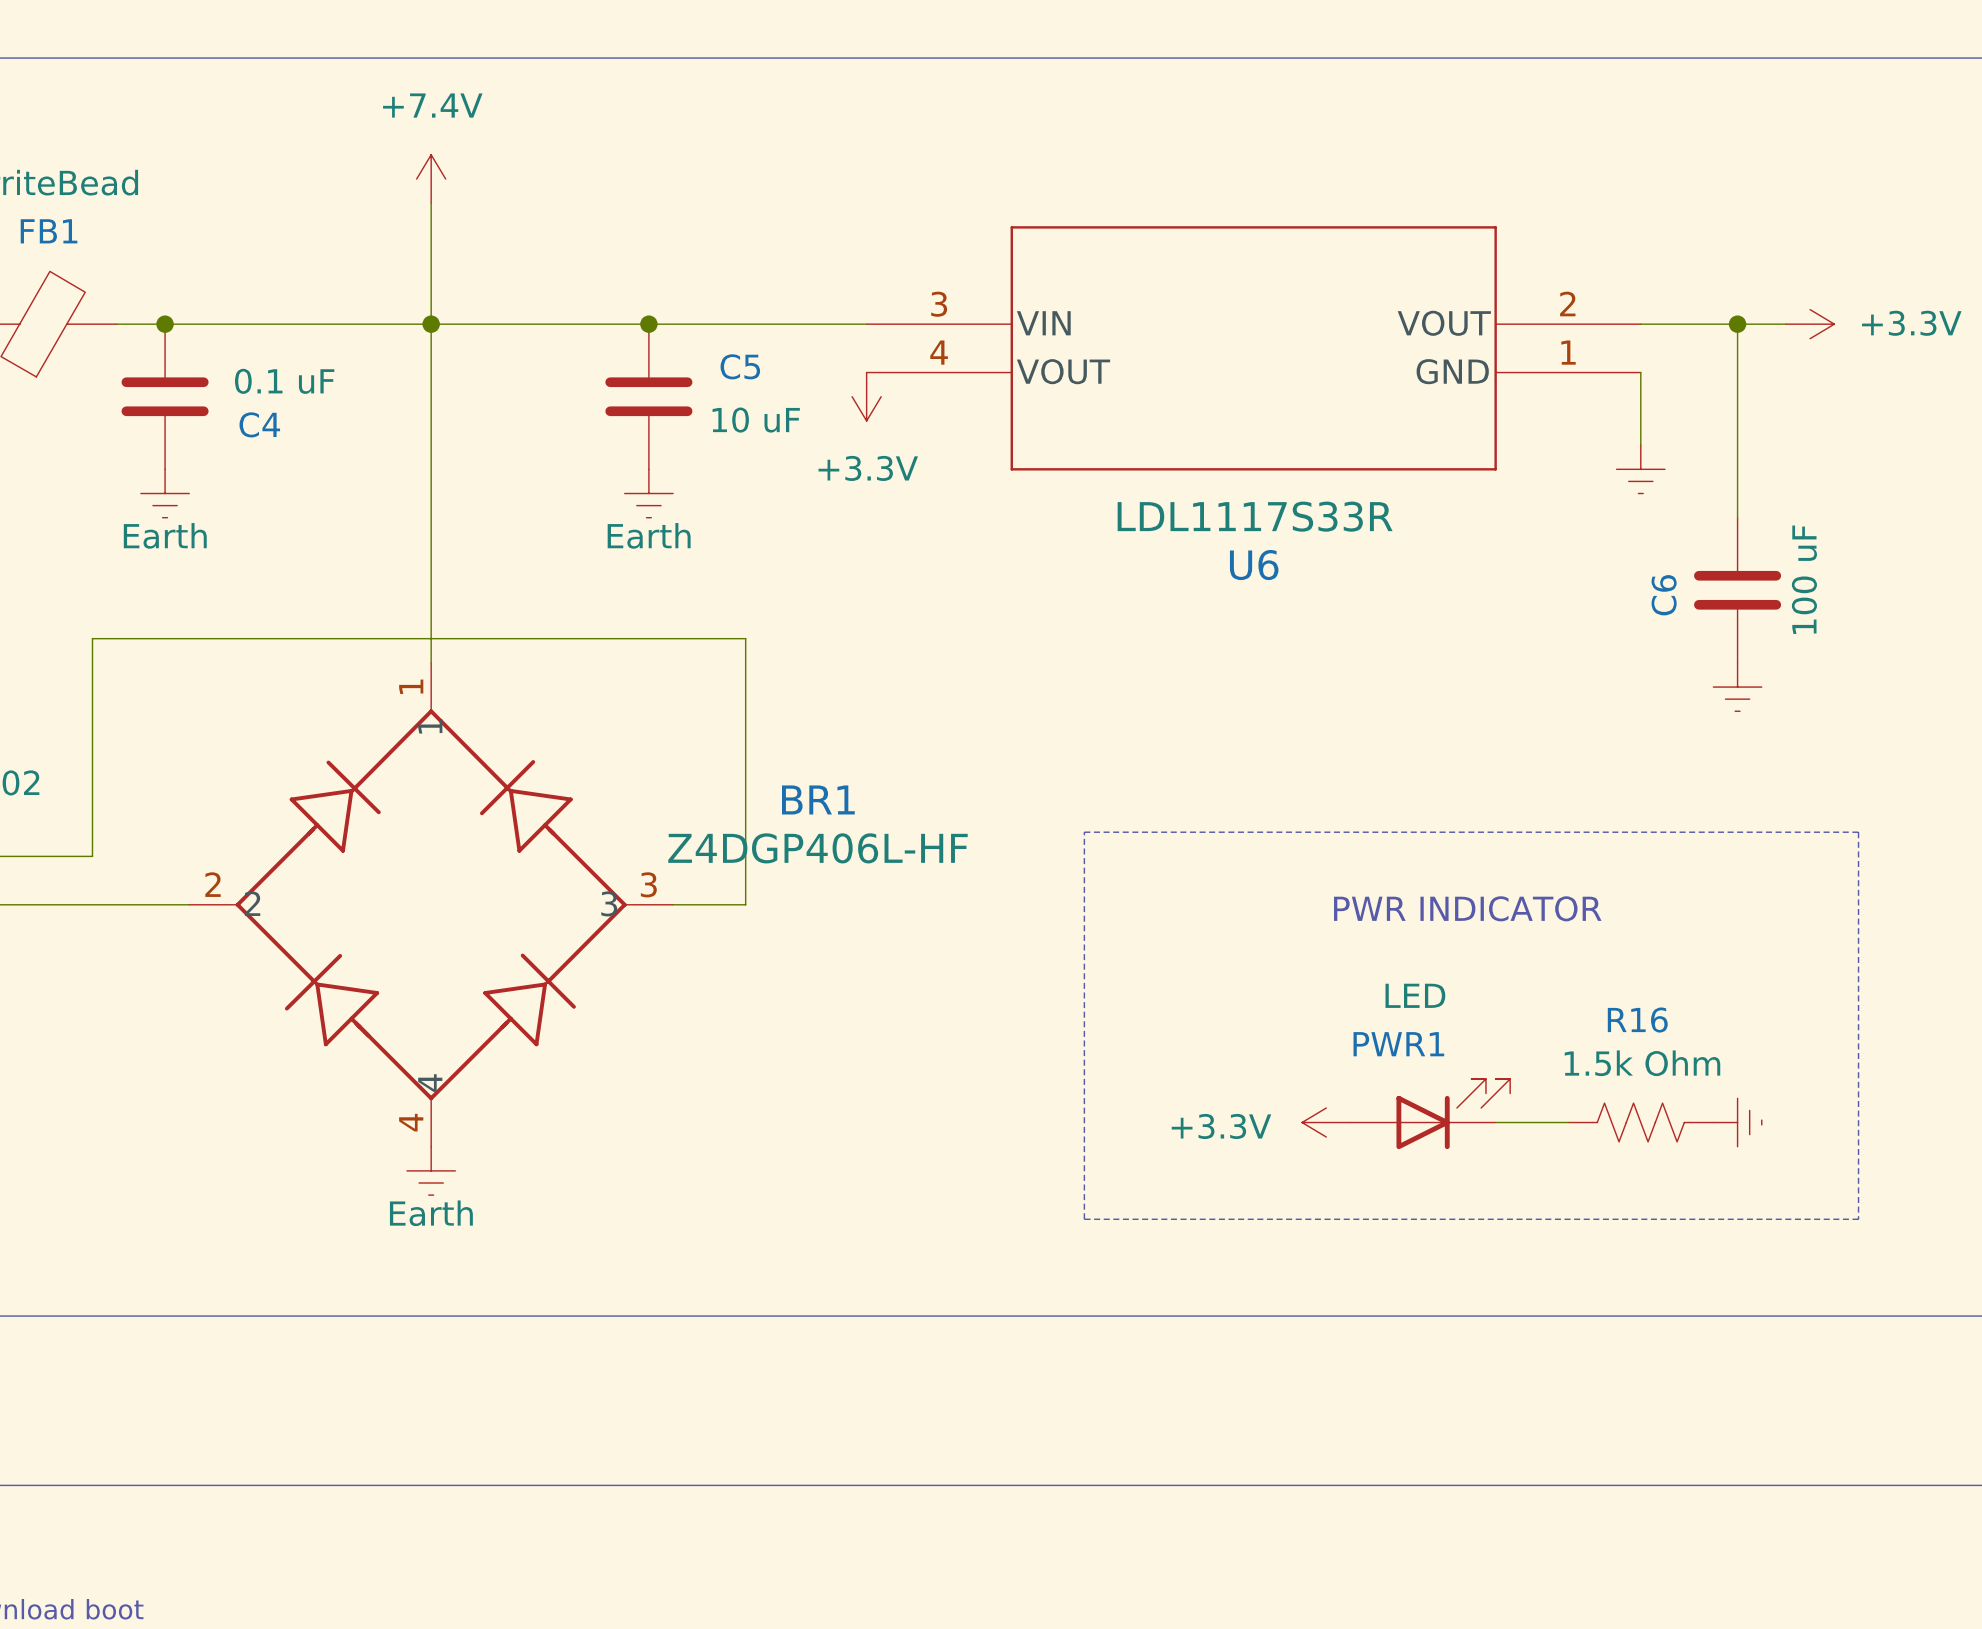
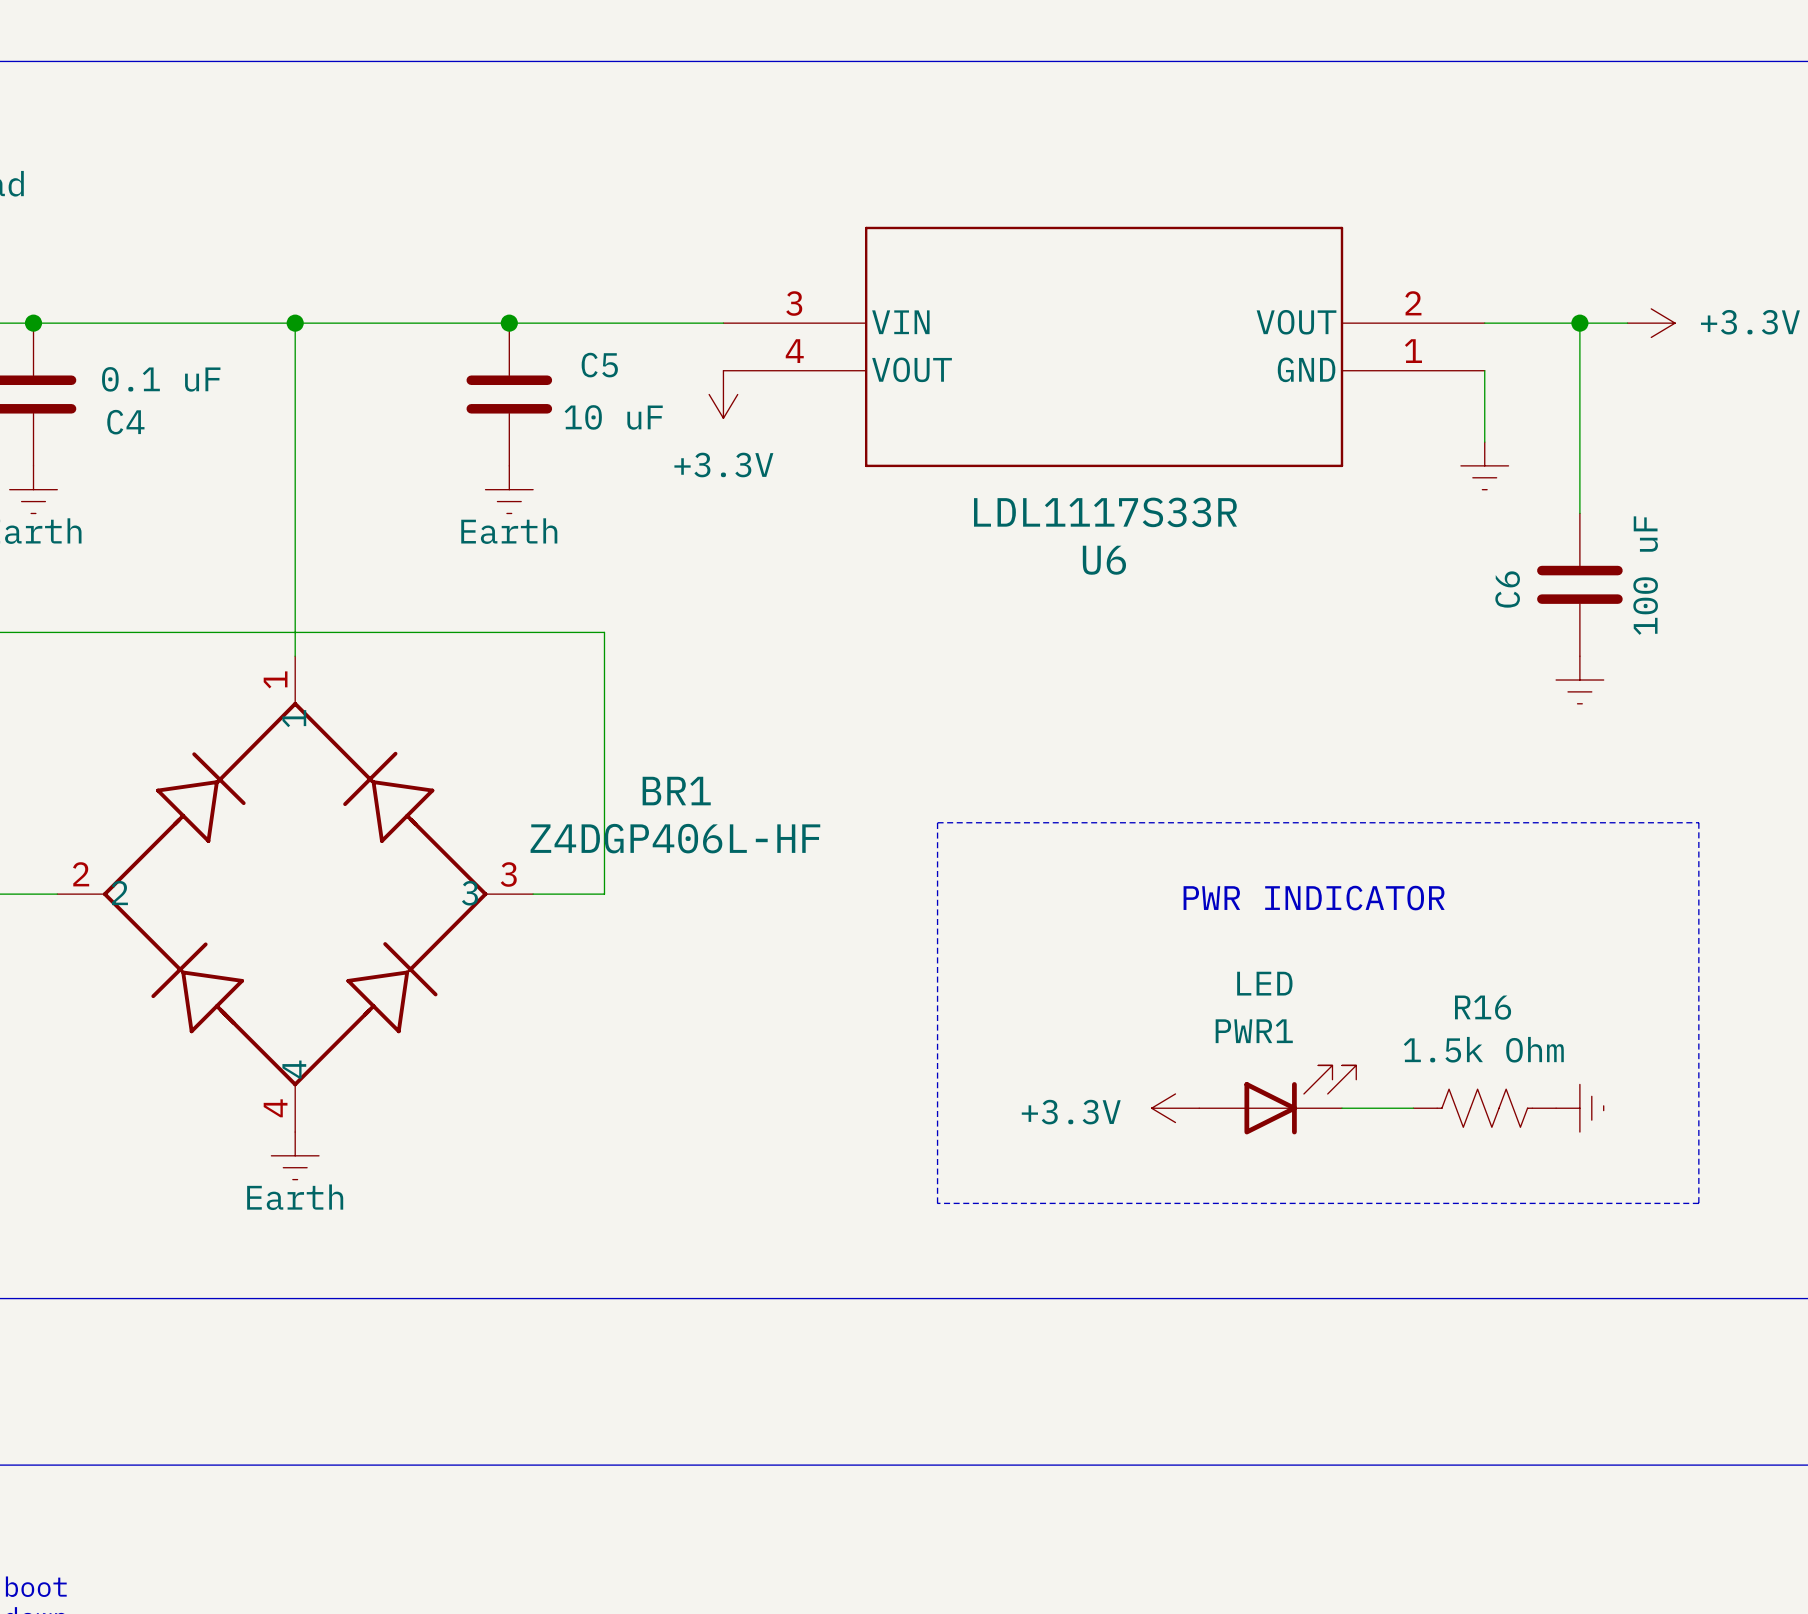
power symbol: +7.4V (431, 179) -> none
wire: (431, 203) (431, 324) -> none

